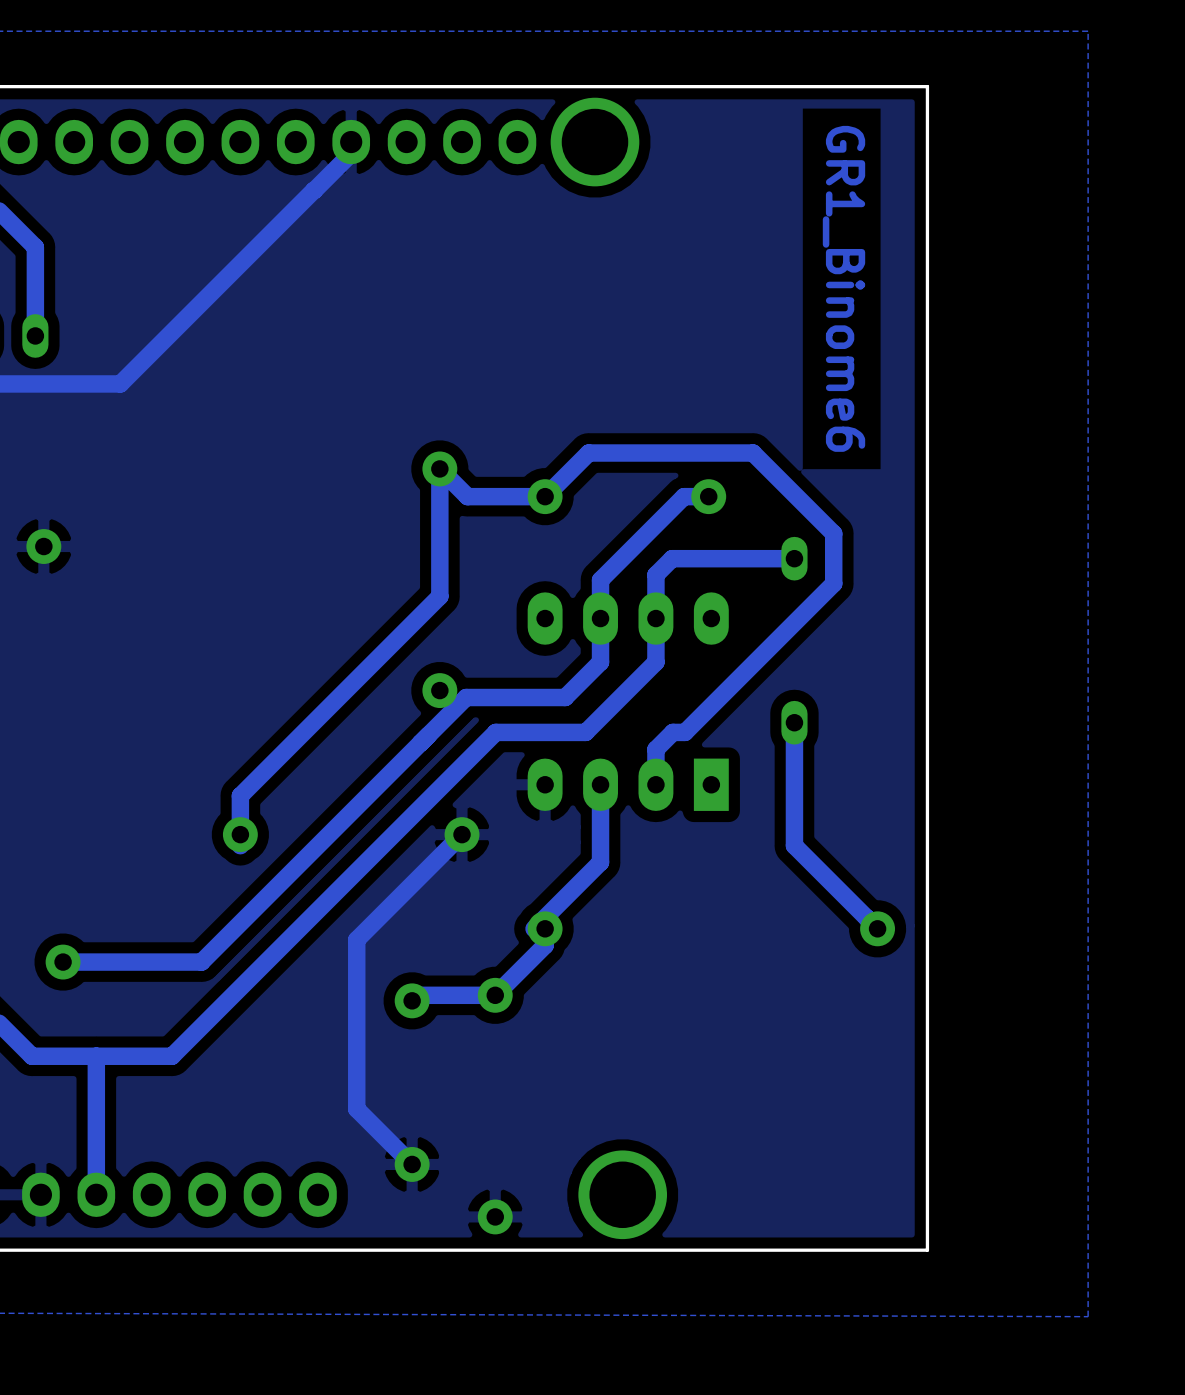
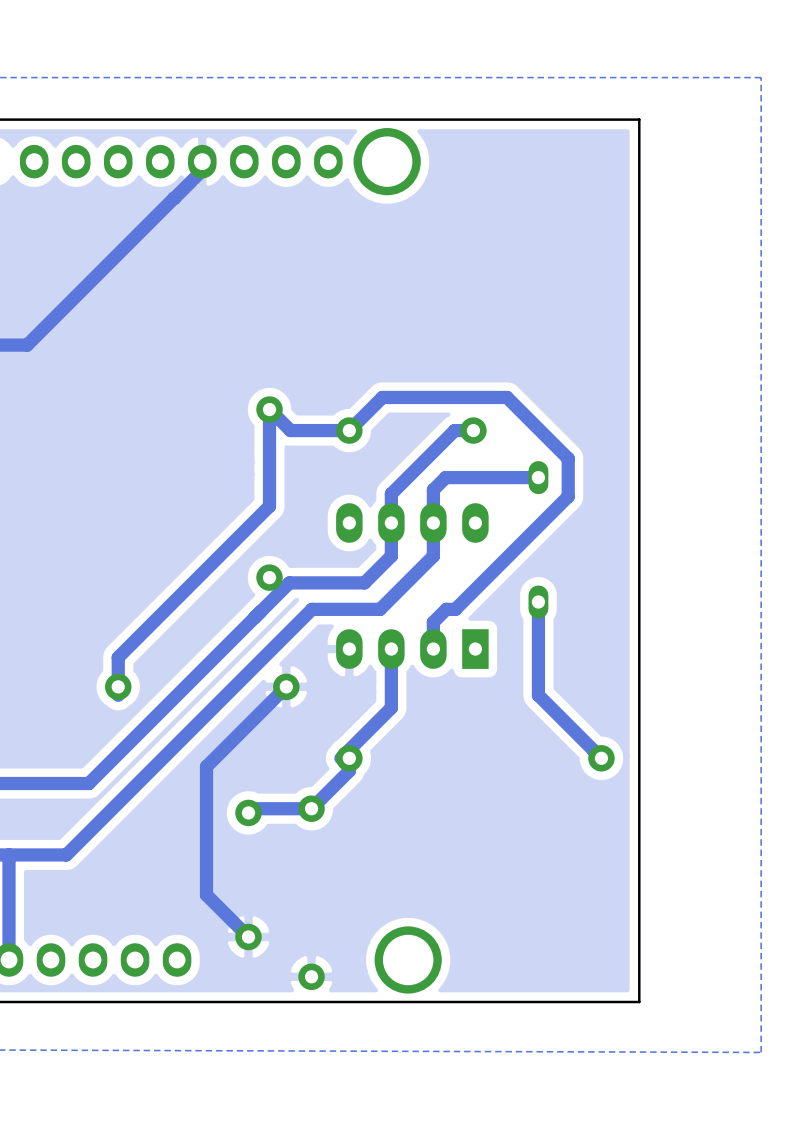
text: GR1_Binome6 (843, 288) -> none

